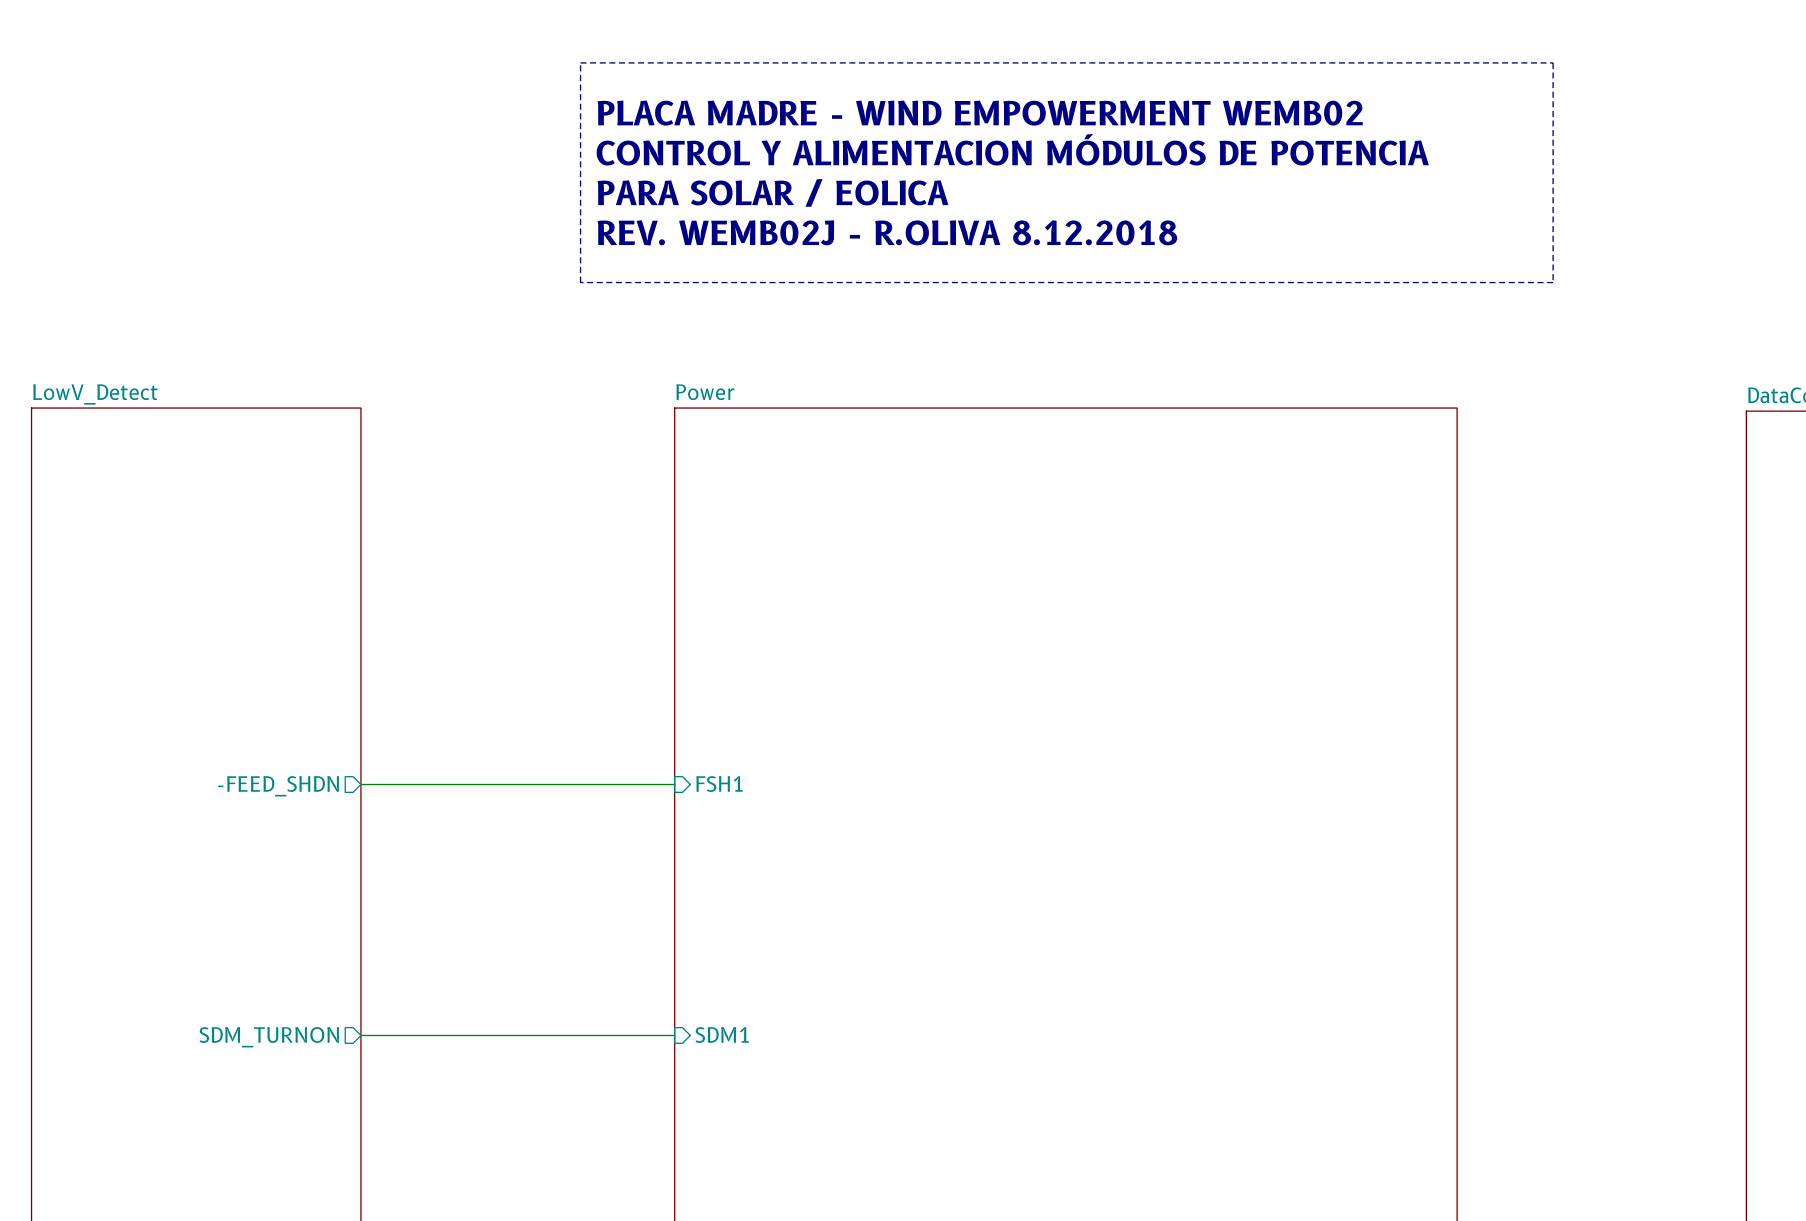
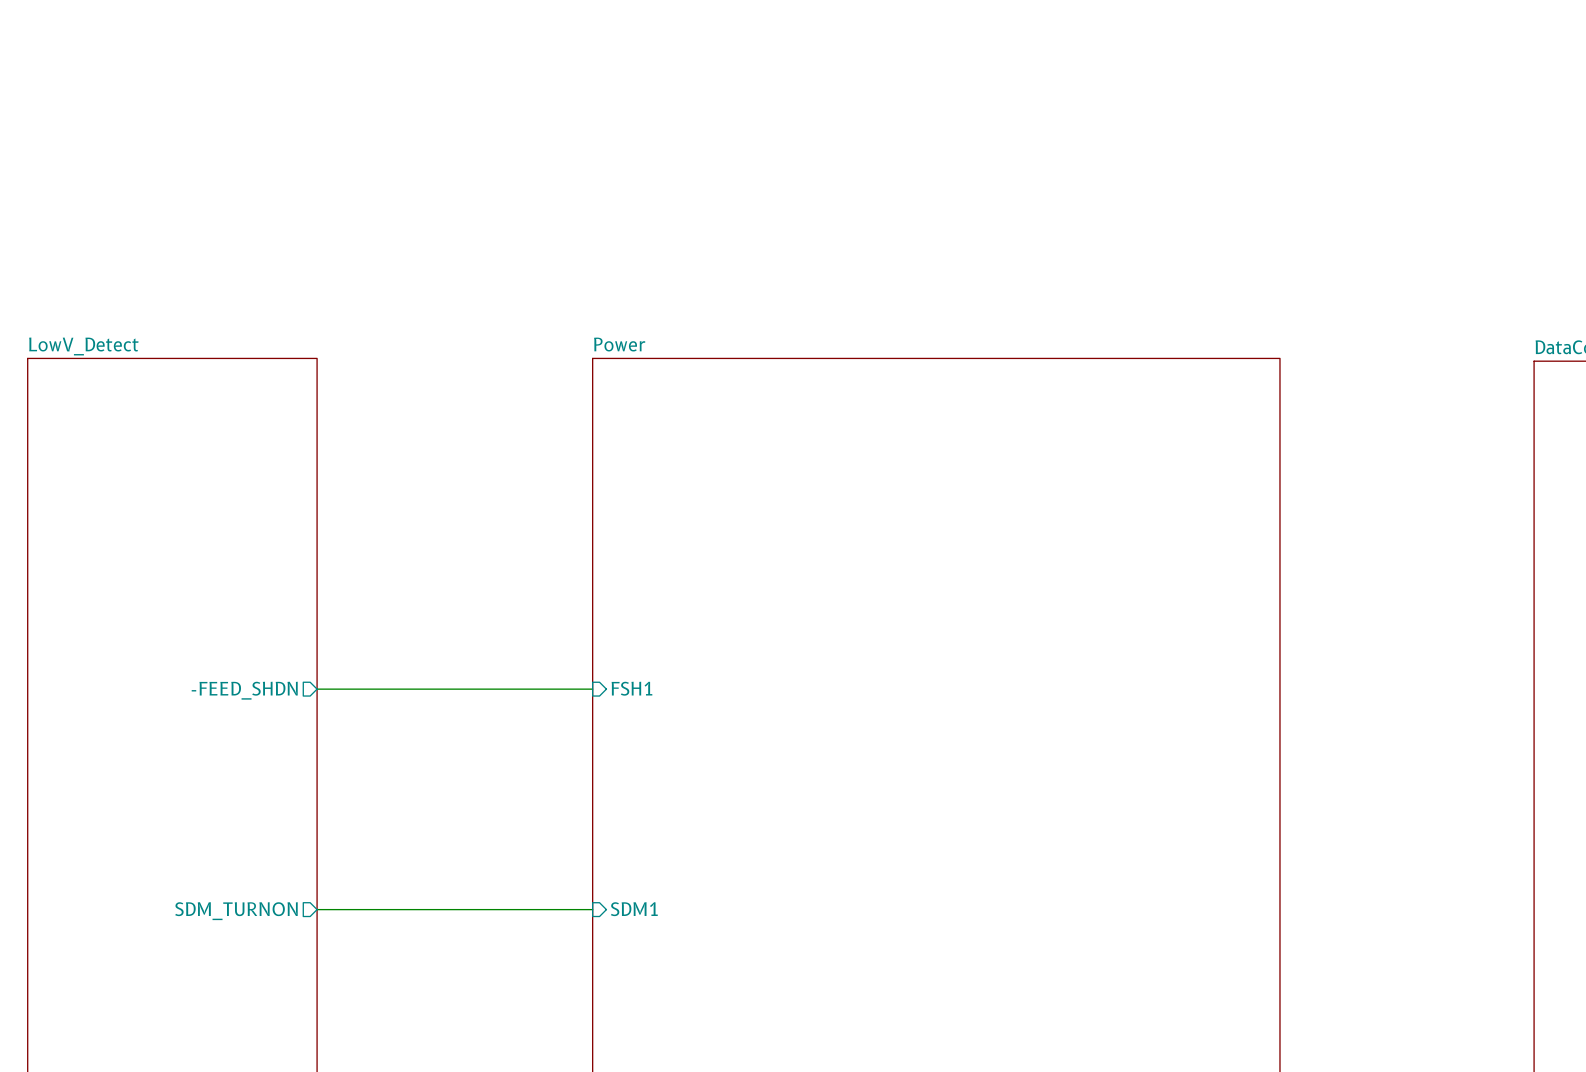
line: (580, 62) (1553, 62) (1553, 282) (580, 282) (580, 62) -> none
text: PLACA MADRE - WIND EMPOWERMENT WEMB02 (980, 113) -> none
text: CONTROL Y ALIMENTACION MÓDULOS DE POTENCIA (1012, 149) -> none
text: PARA SOLAR / EOLICA (772, 192) -> none
text: REV. WEMB02J - R.OLIVA 8.12.2018 (887, 232) -> none

